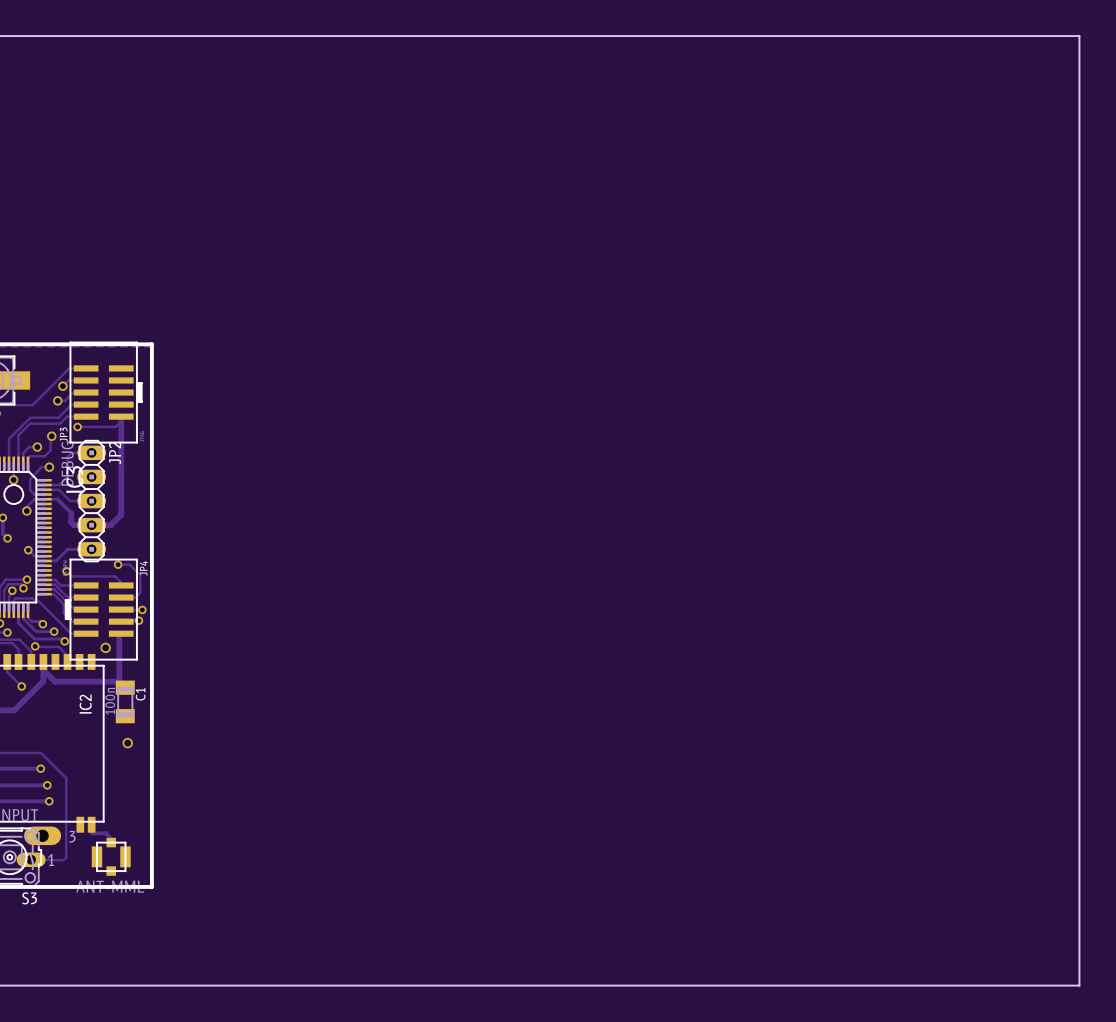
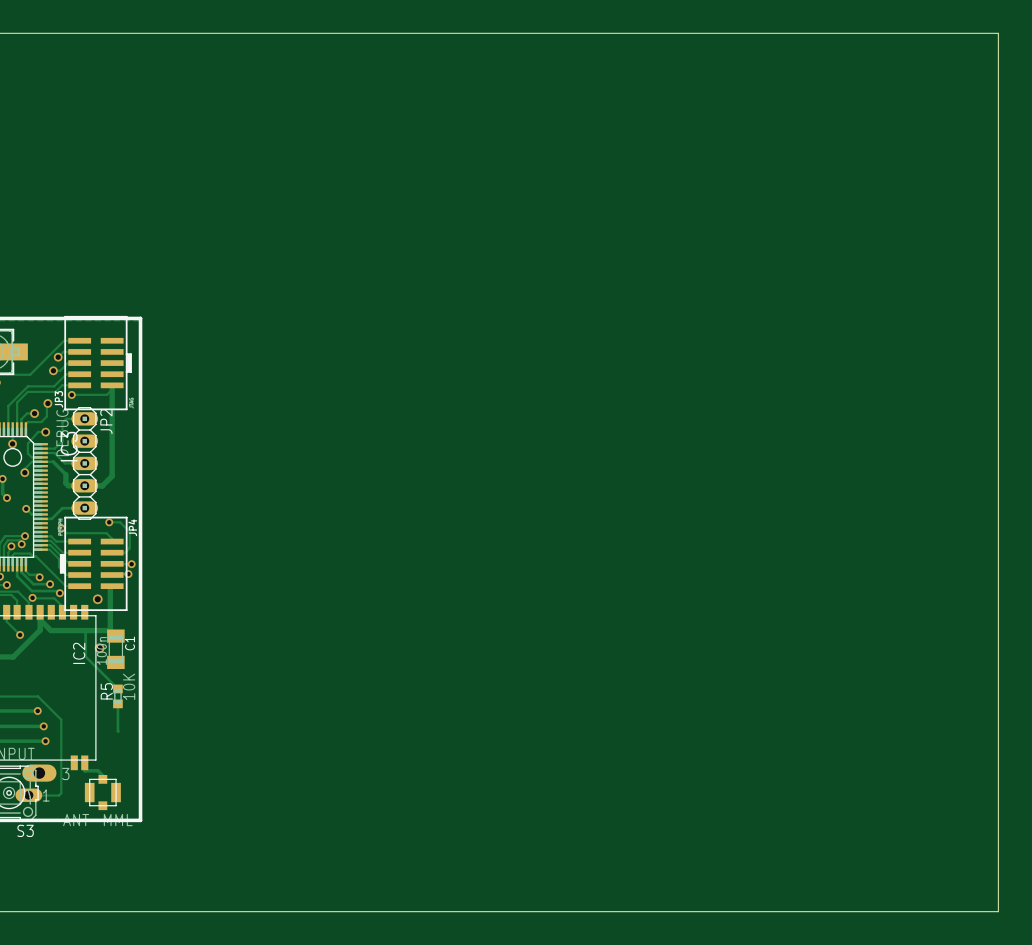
track: none -> (85, 630) (85, 656) (117, 688)
via position: (127, 743) -> (99, 648)
R5: none -> 10K (117, 696)
track: none -> (117, 703) (118, 731)

